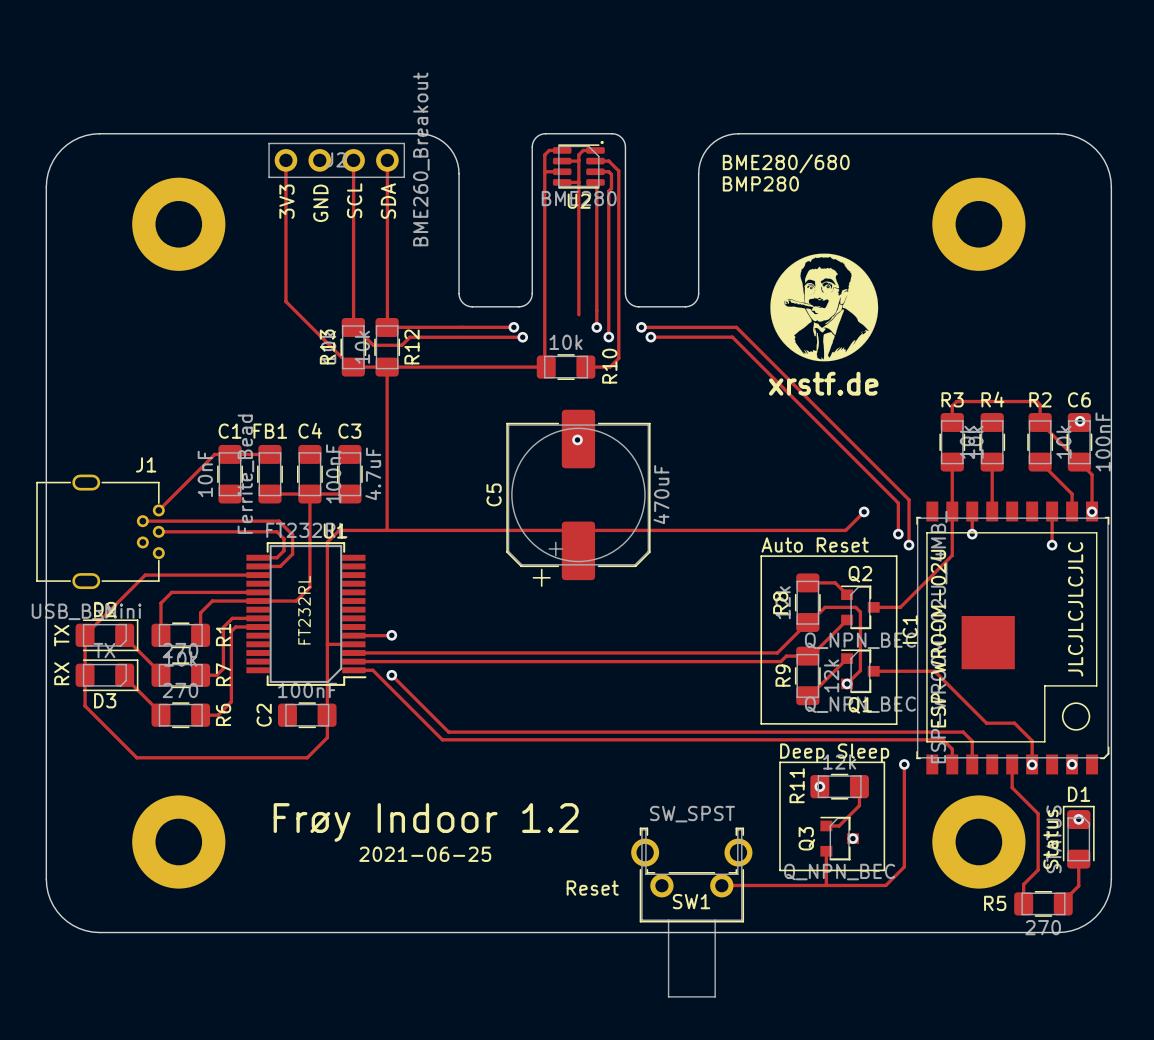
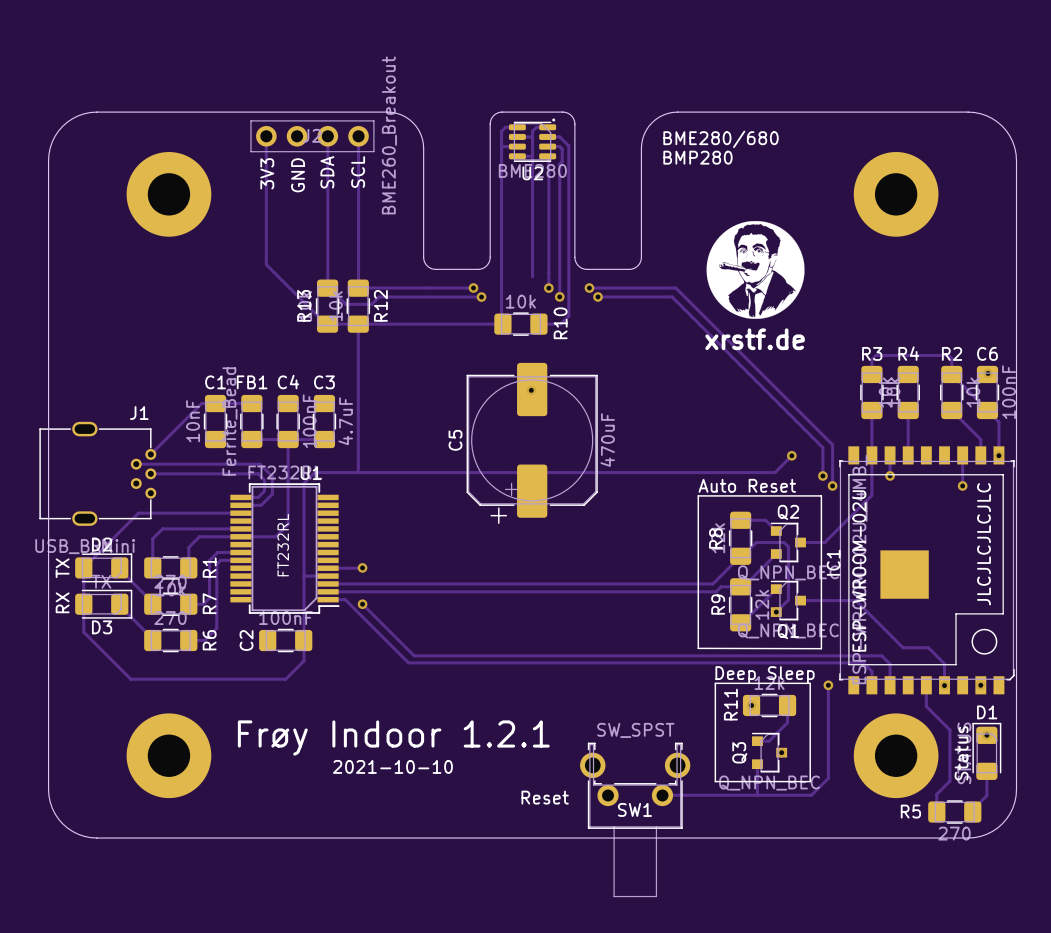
text: SCL (354, 200) -> SDA (327, 172)
text: SDA (388, 201) -> SCL (358, 172)
text: Frøy Indoor 1.2 (426, 822) -> Frøy Indoor 1.2.1 (393, 738)
text: 2021-06-25 (425, 854) -> 2021-10-10 (392, 766)

